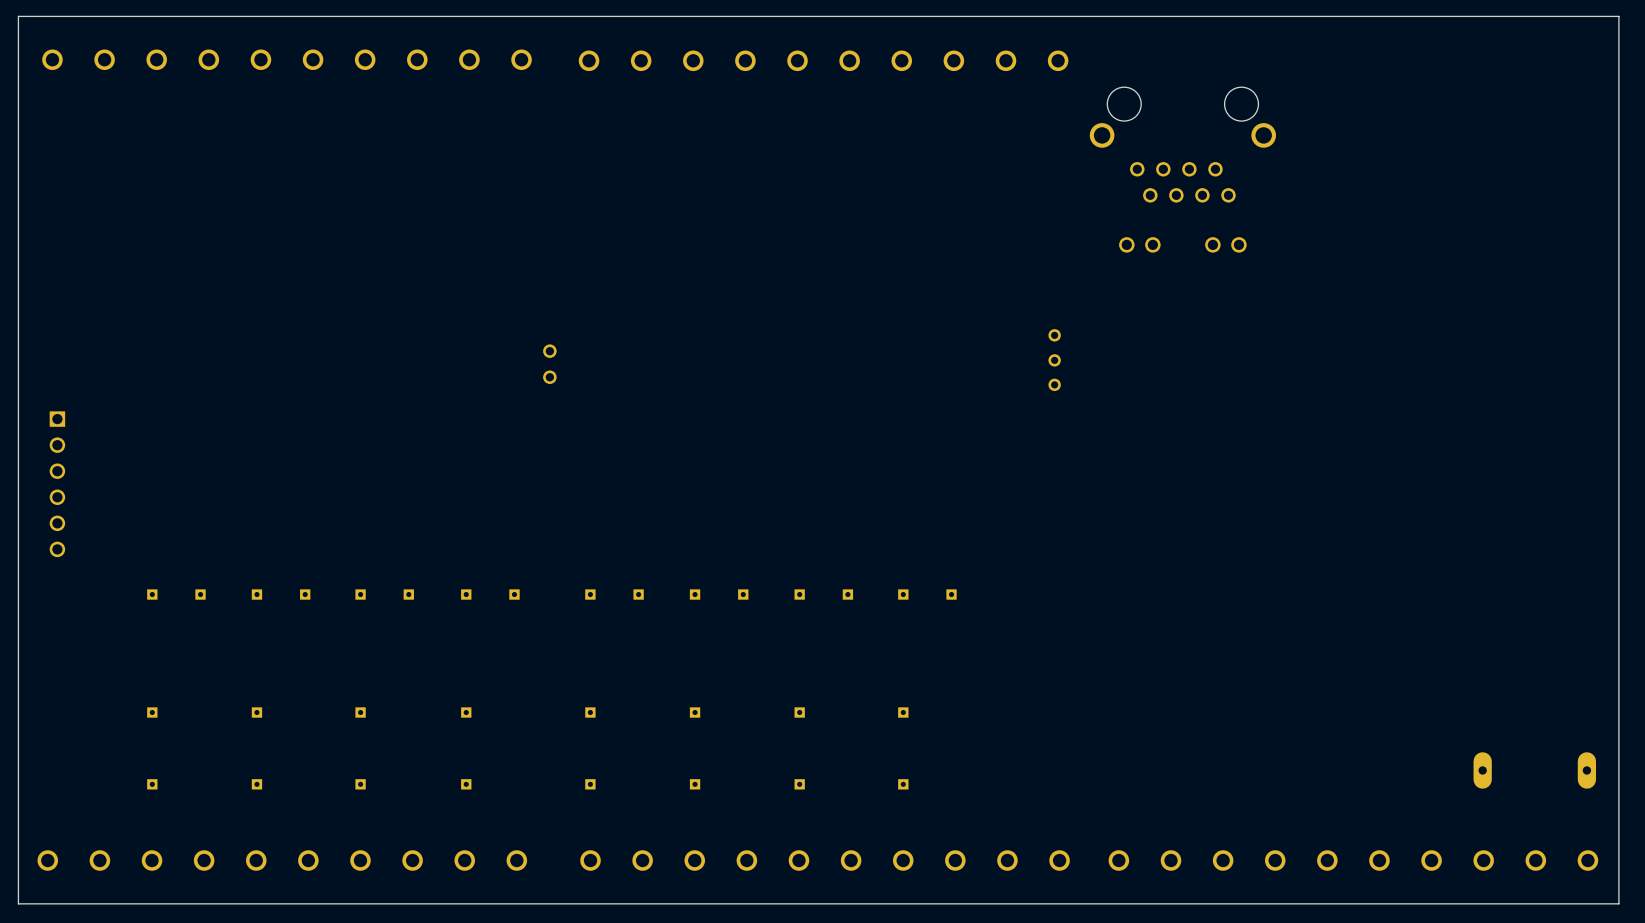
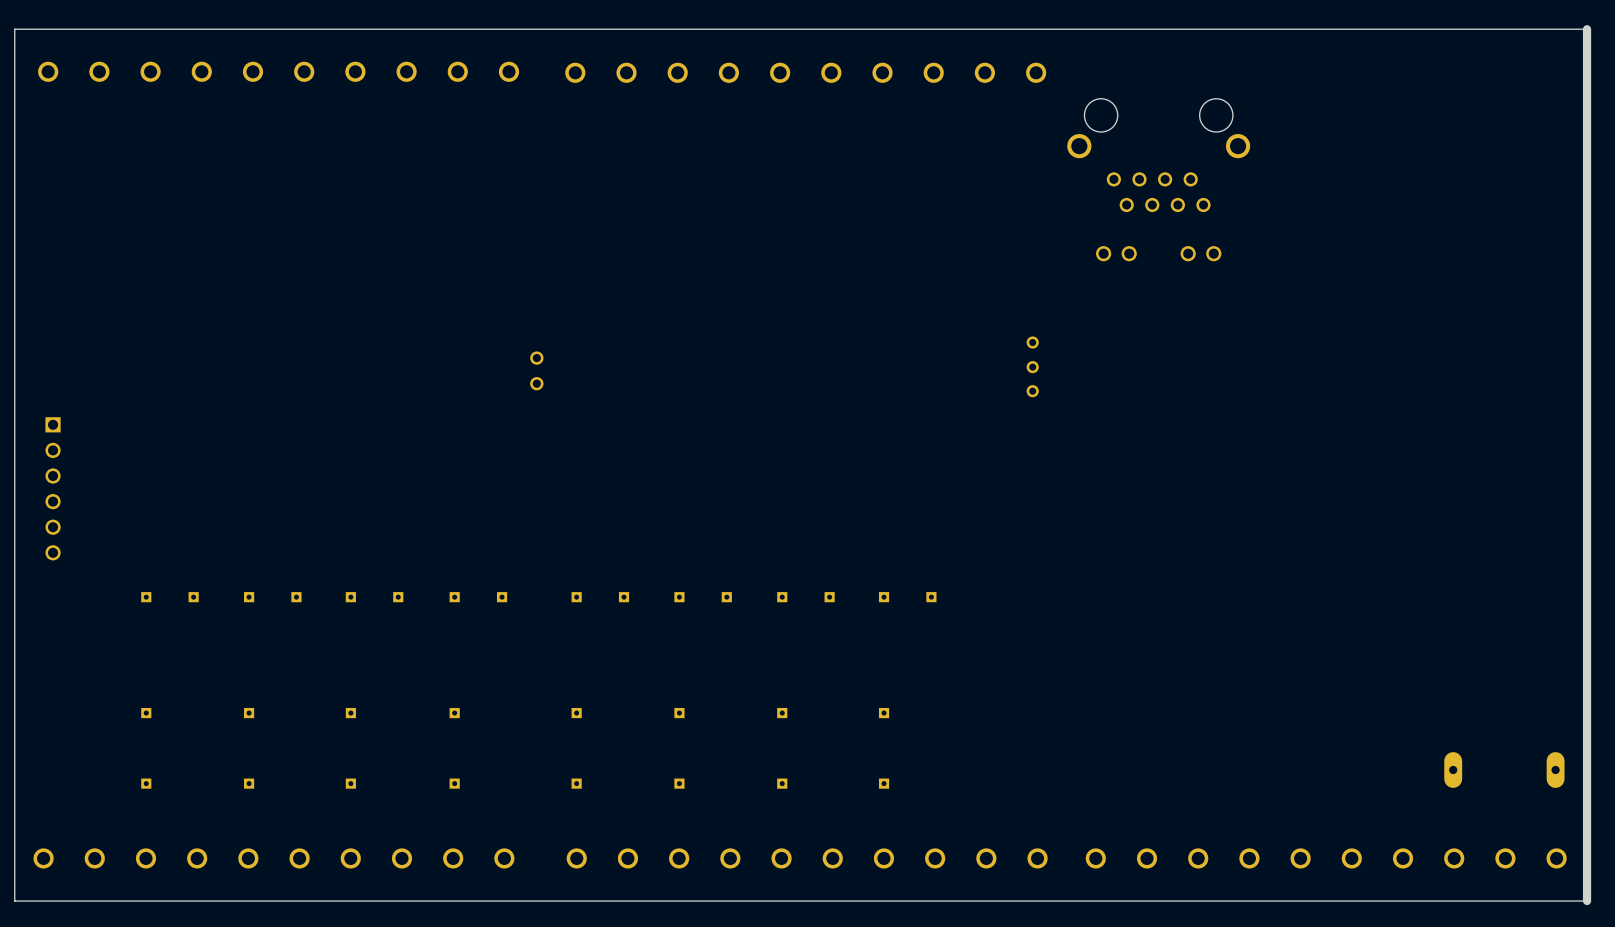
board edge width: thin (1618, 16) (1618, 903) -> thick (1587, 29) (1587, 901)

